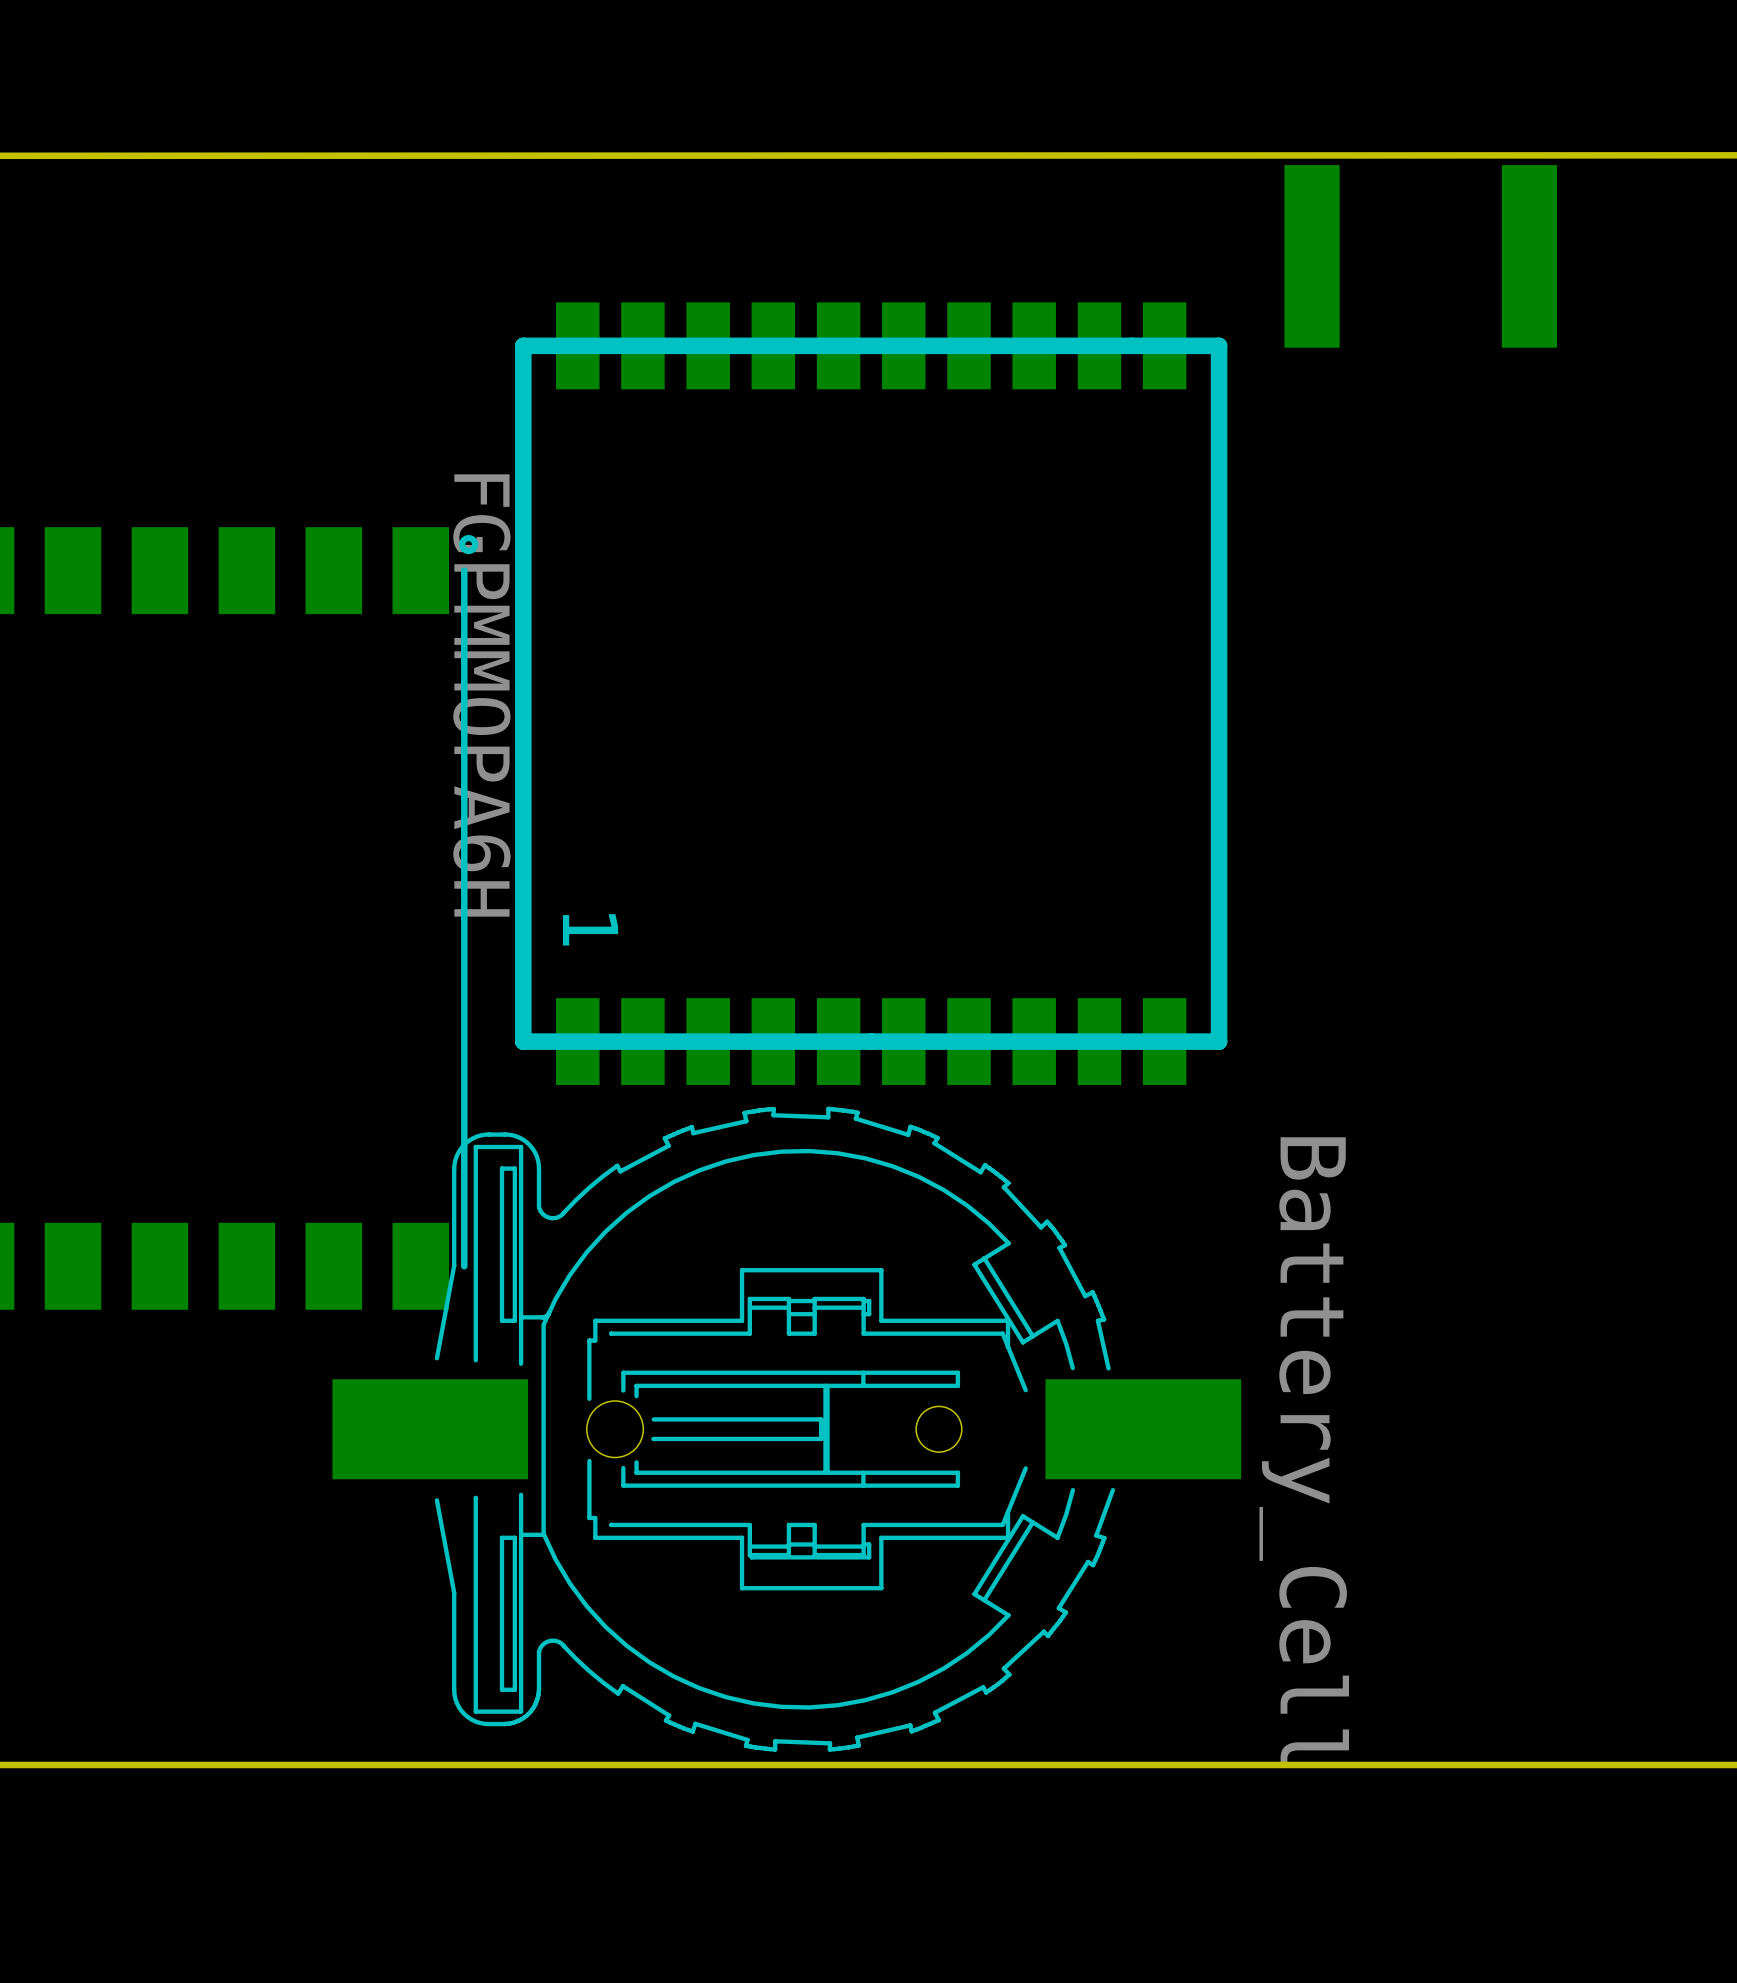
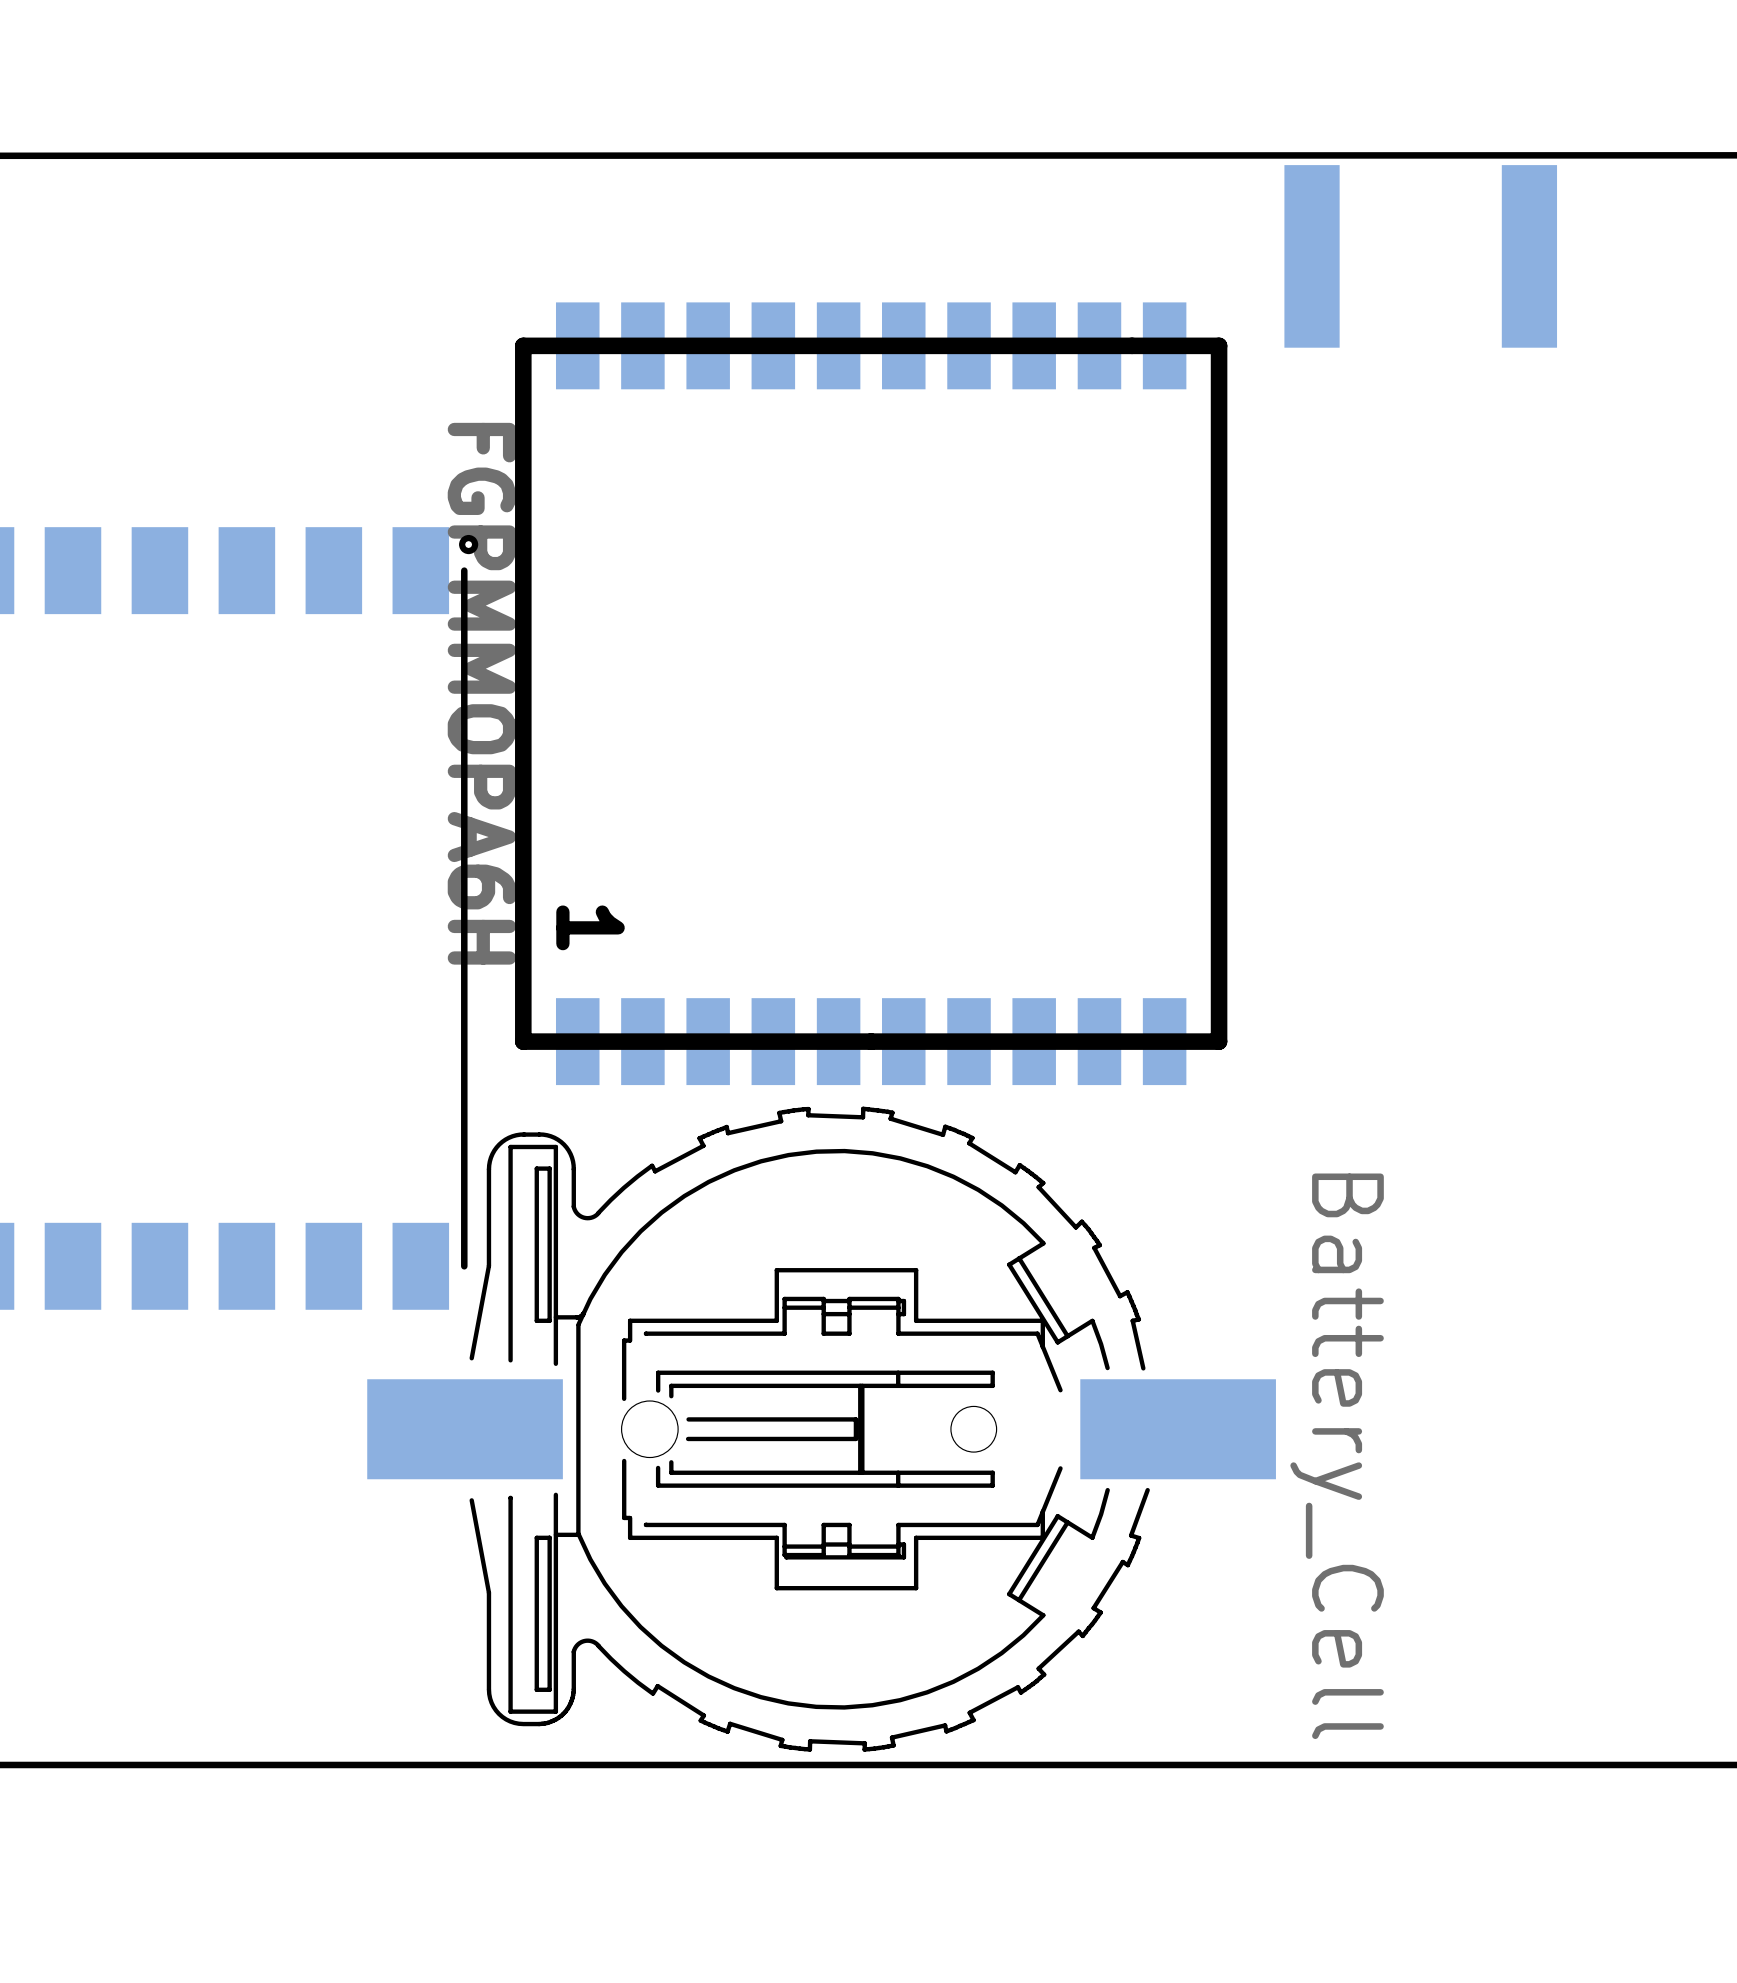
part position: (786, 1429) -> (821, 1429)

